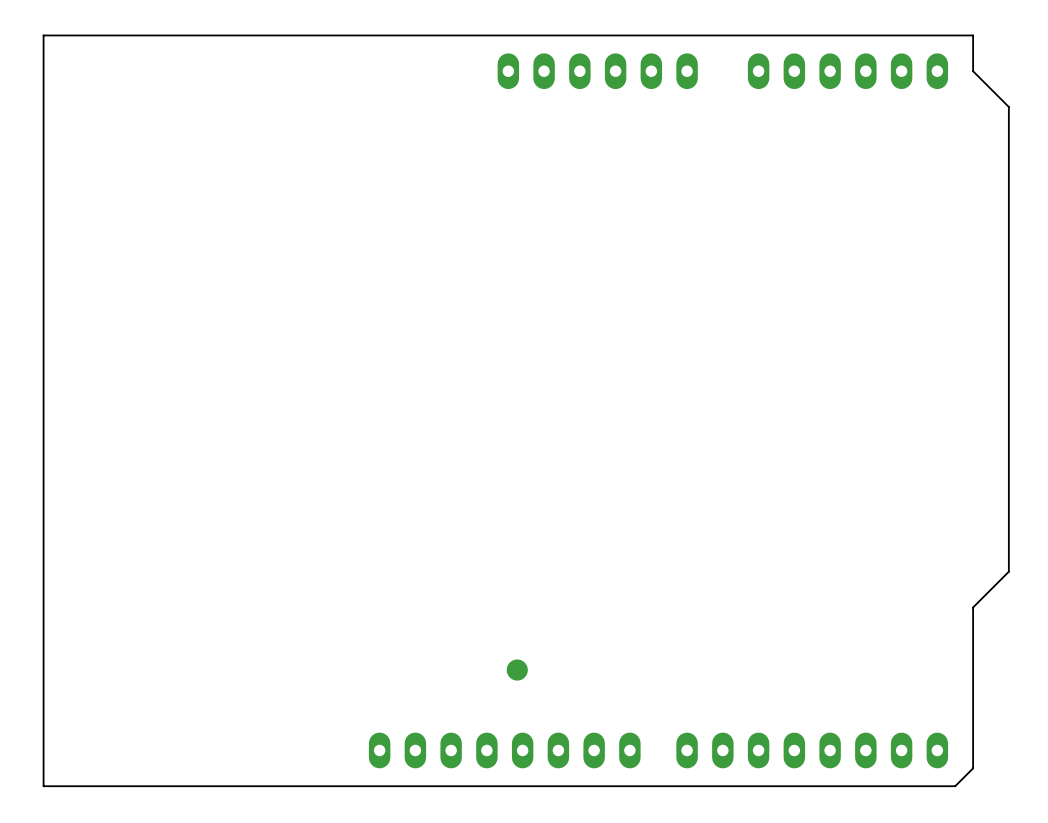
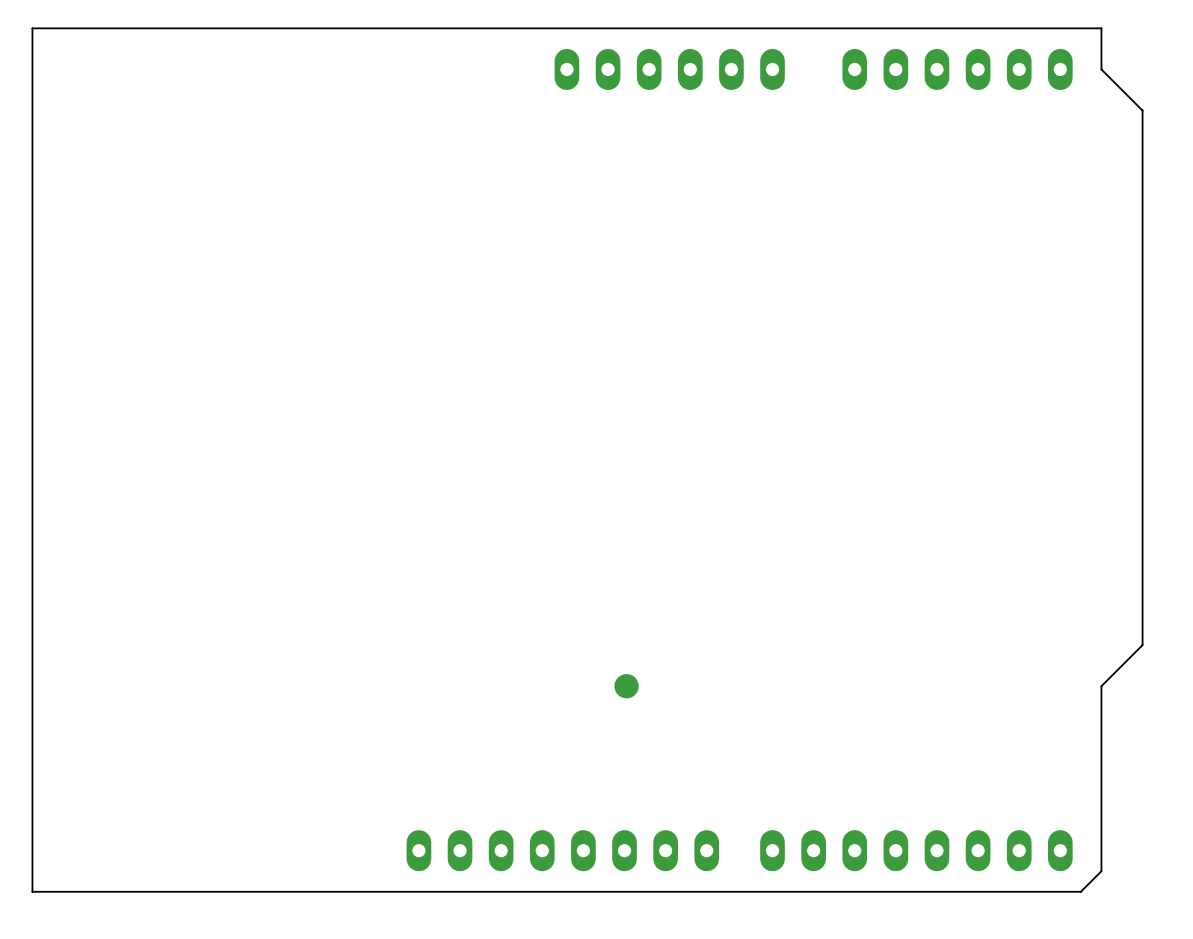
part position: (517, 670) -> (626, 686)

